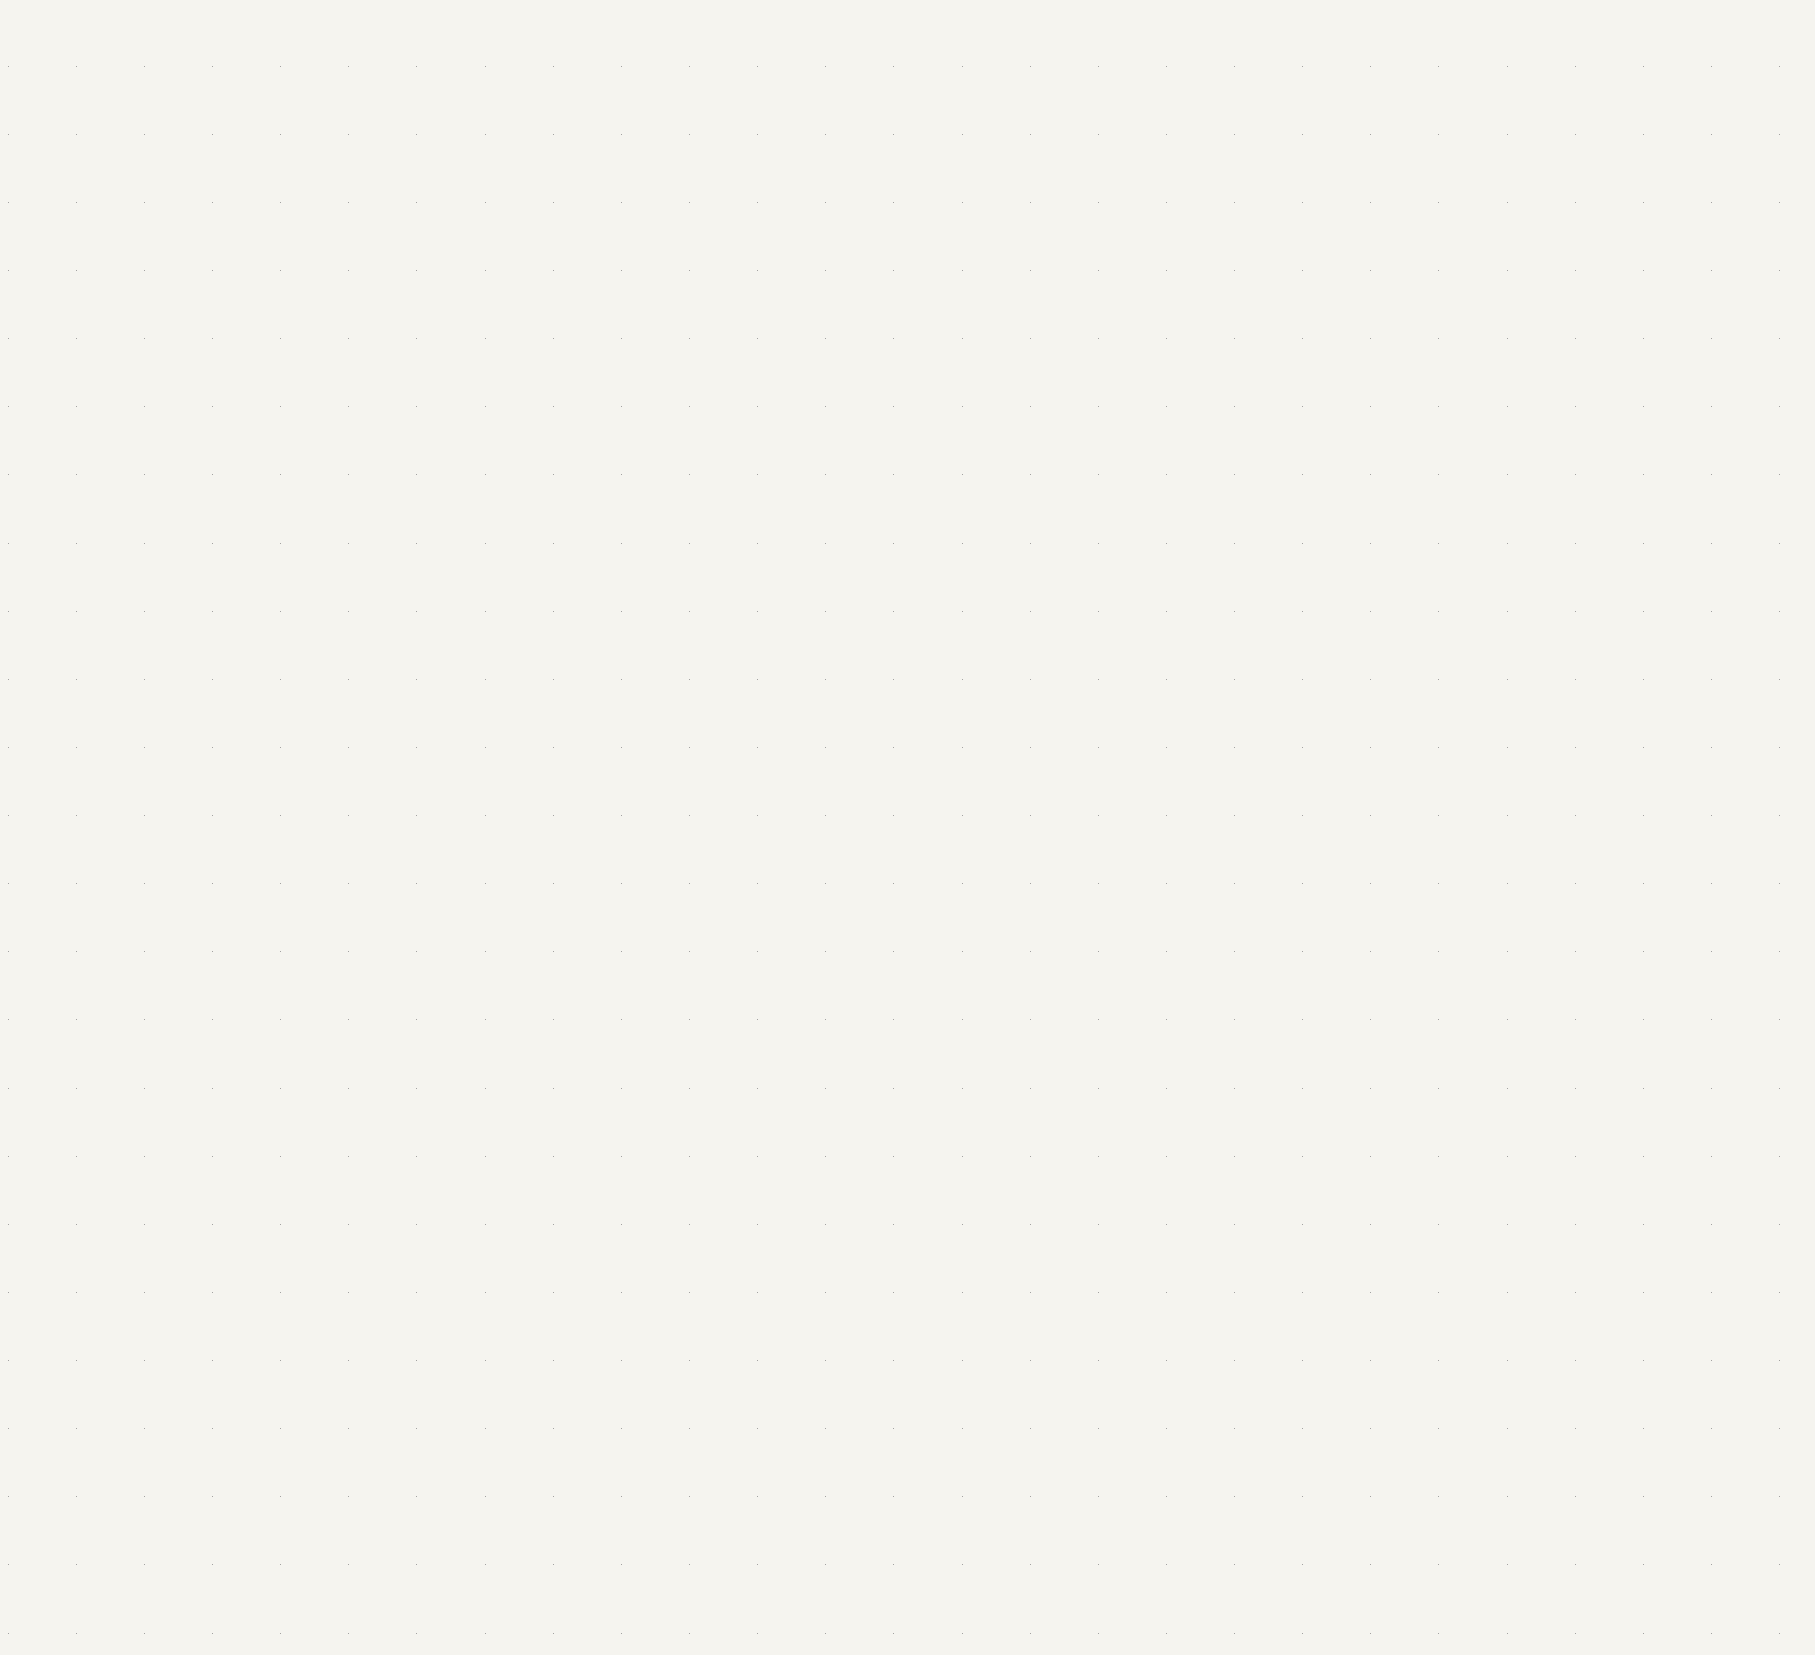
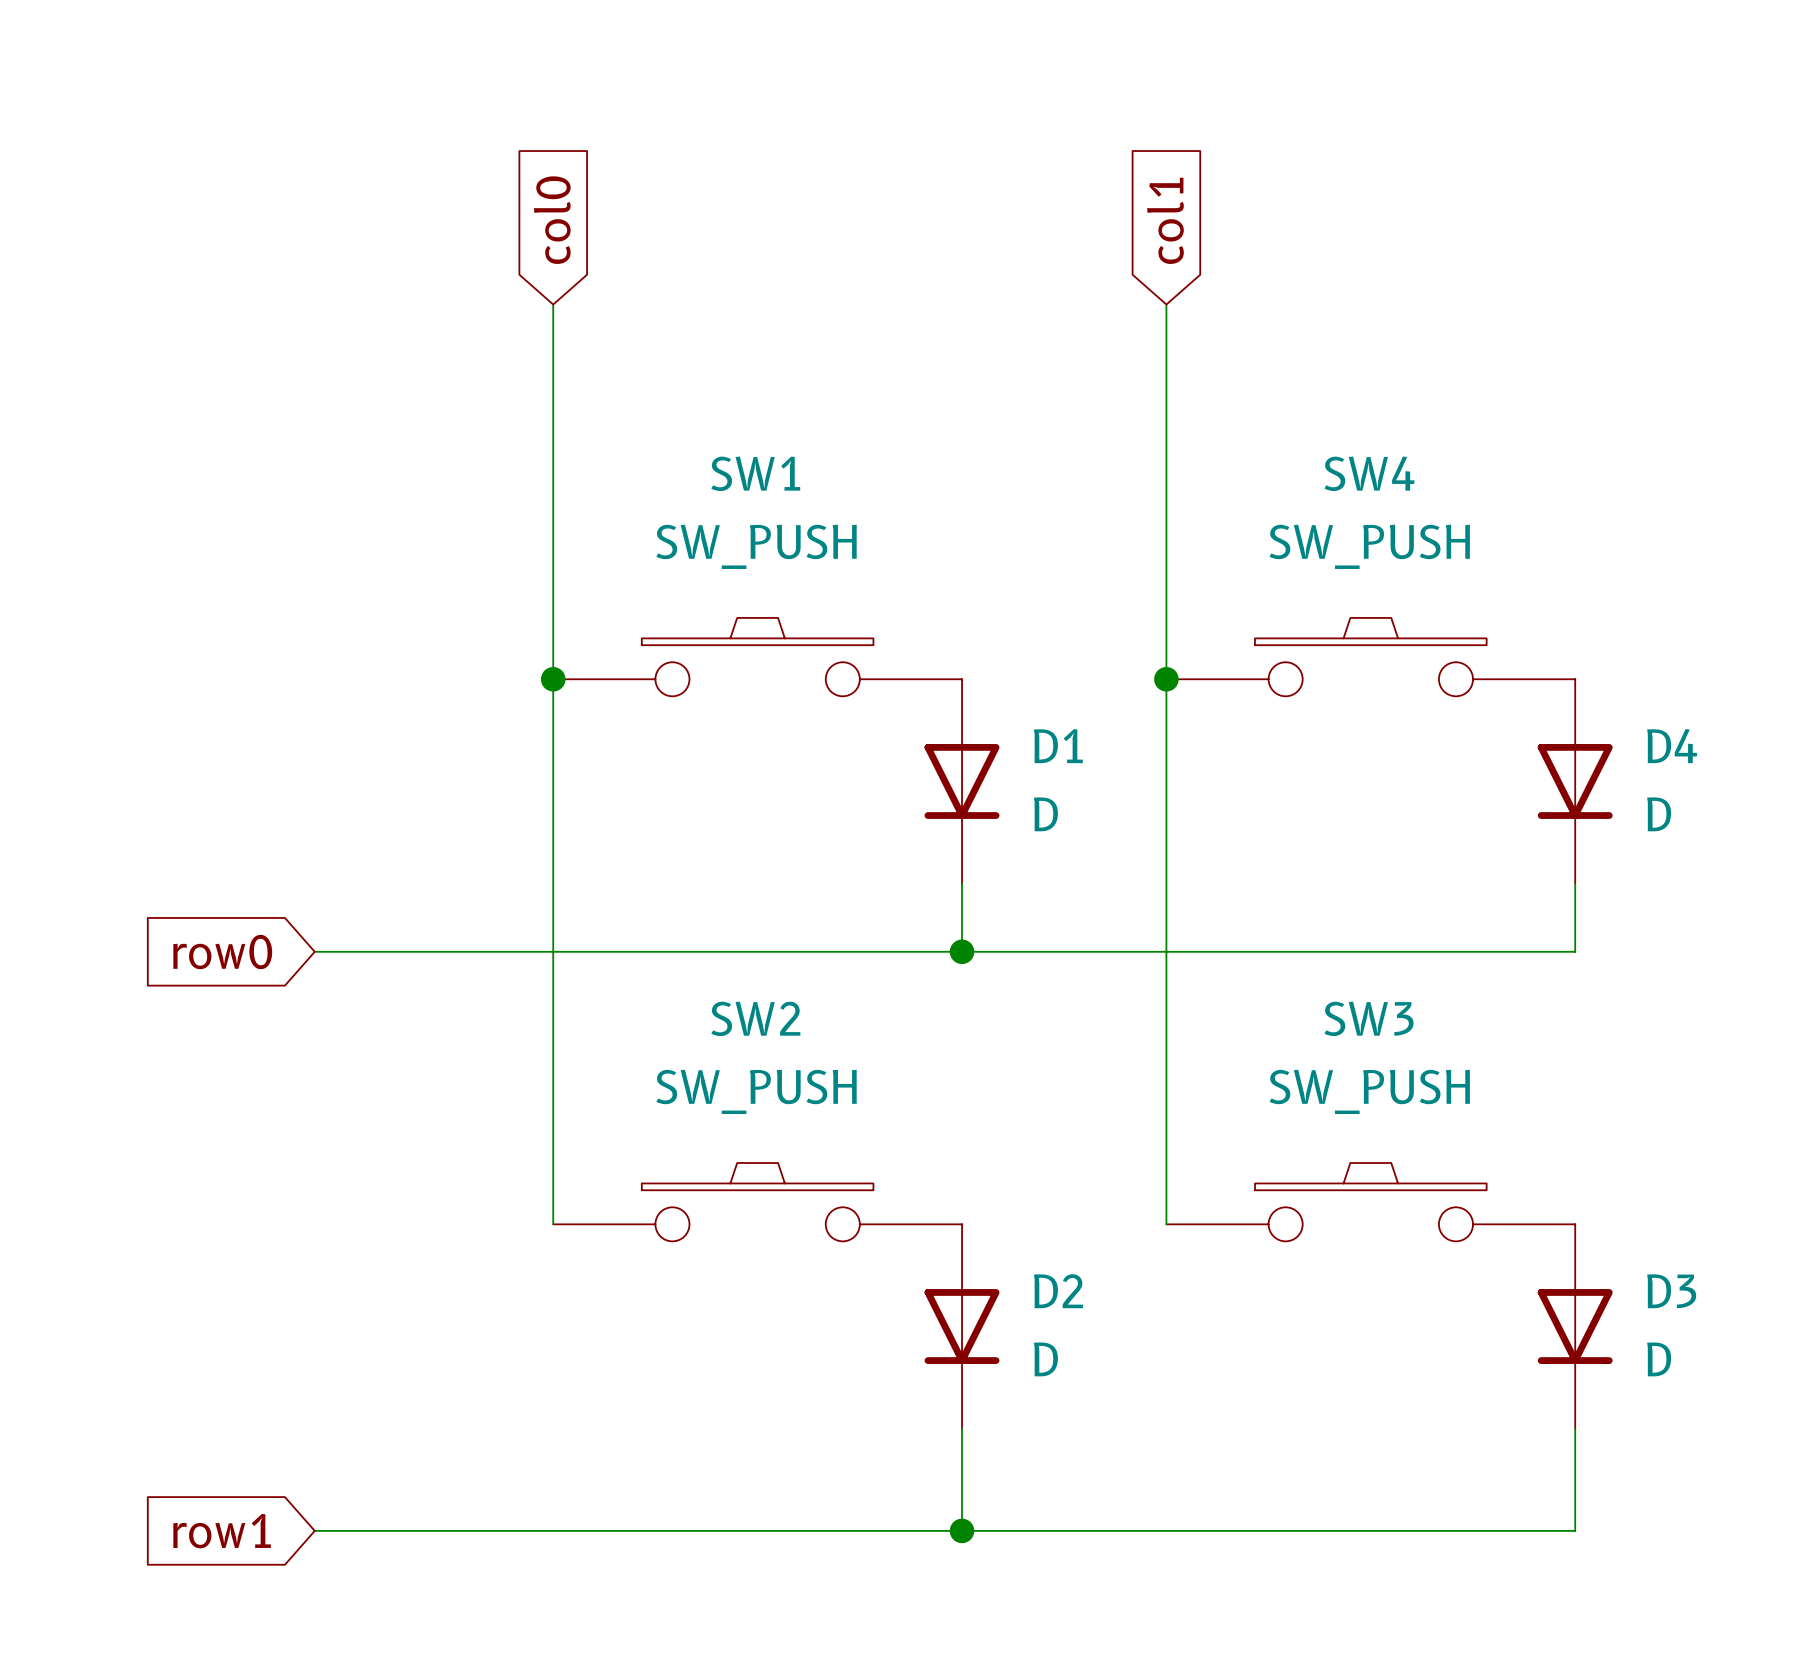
global label: none -> col0 (552, 220)
global label: none -> col1 (1165, 220)
wire: none -> (553, 304) (553, 1224)
wire: none -> (1166, 304) (1166, 1224)
SW1: none -> SW_PUSH (757, 657)
SW4: none -> SW_PUSH (1370, 657)
junction: none -> (553, 679)
junction: none -> (1166, 679)
D1: none -> D (962, 781)
D4: none -> D (1575, 781)
wire: none -> (962, 883) (962, 951)
wire: none -> (1575, 883) (1575, 951) (314, 951)
junction: none -> (962, 951)
global label: none -> row0 (222, 952)
SW2: none -> SW_PUSH (757, 1202)
SW3: none -> SW_PUSH (1370, 1202)
D2: none -> D (962, 1326)
D3: none -> D (1575, 1326)
wire: none -> (962, 1428) (962, 1530)
wire: none -> (1575, 1428) (1575, 1530) (314, 1530)
junction: none -> (962, 1530)
global label: none -> row1 (222, 1531)

